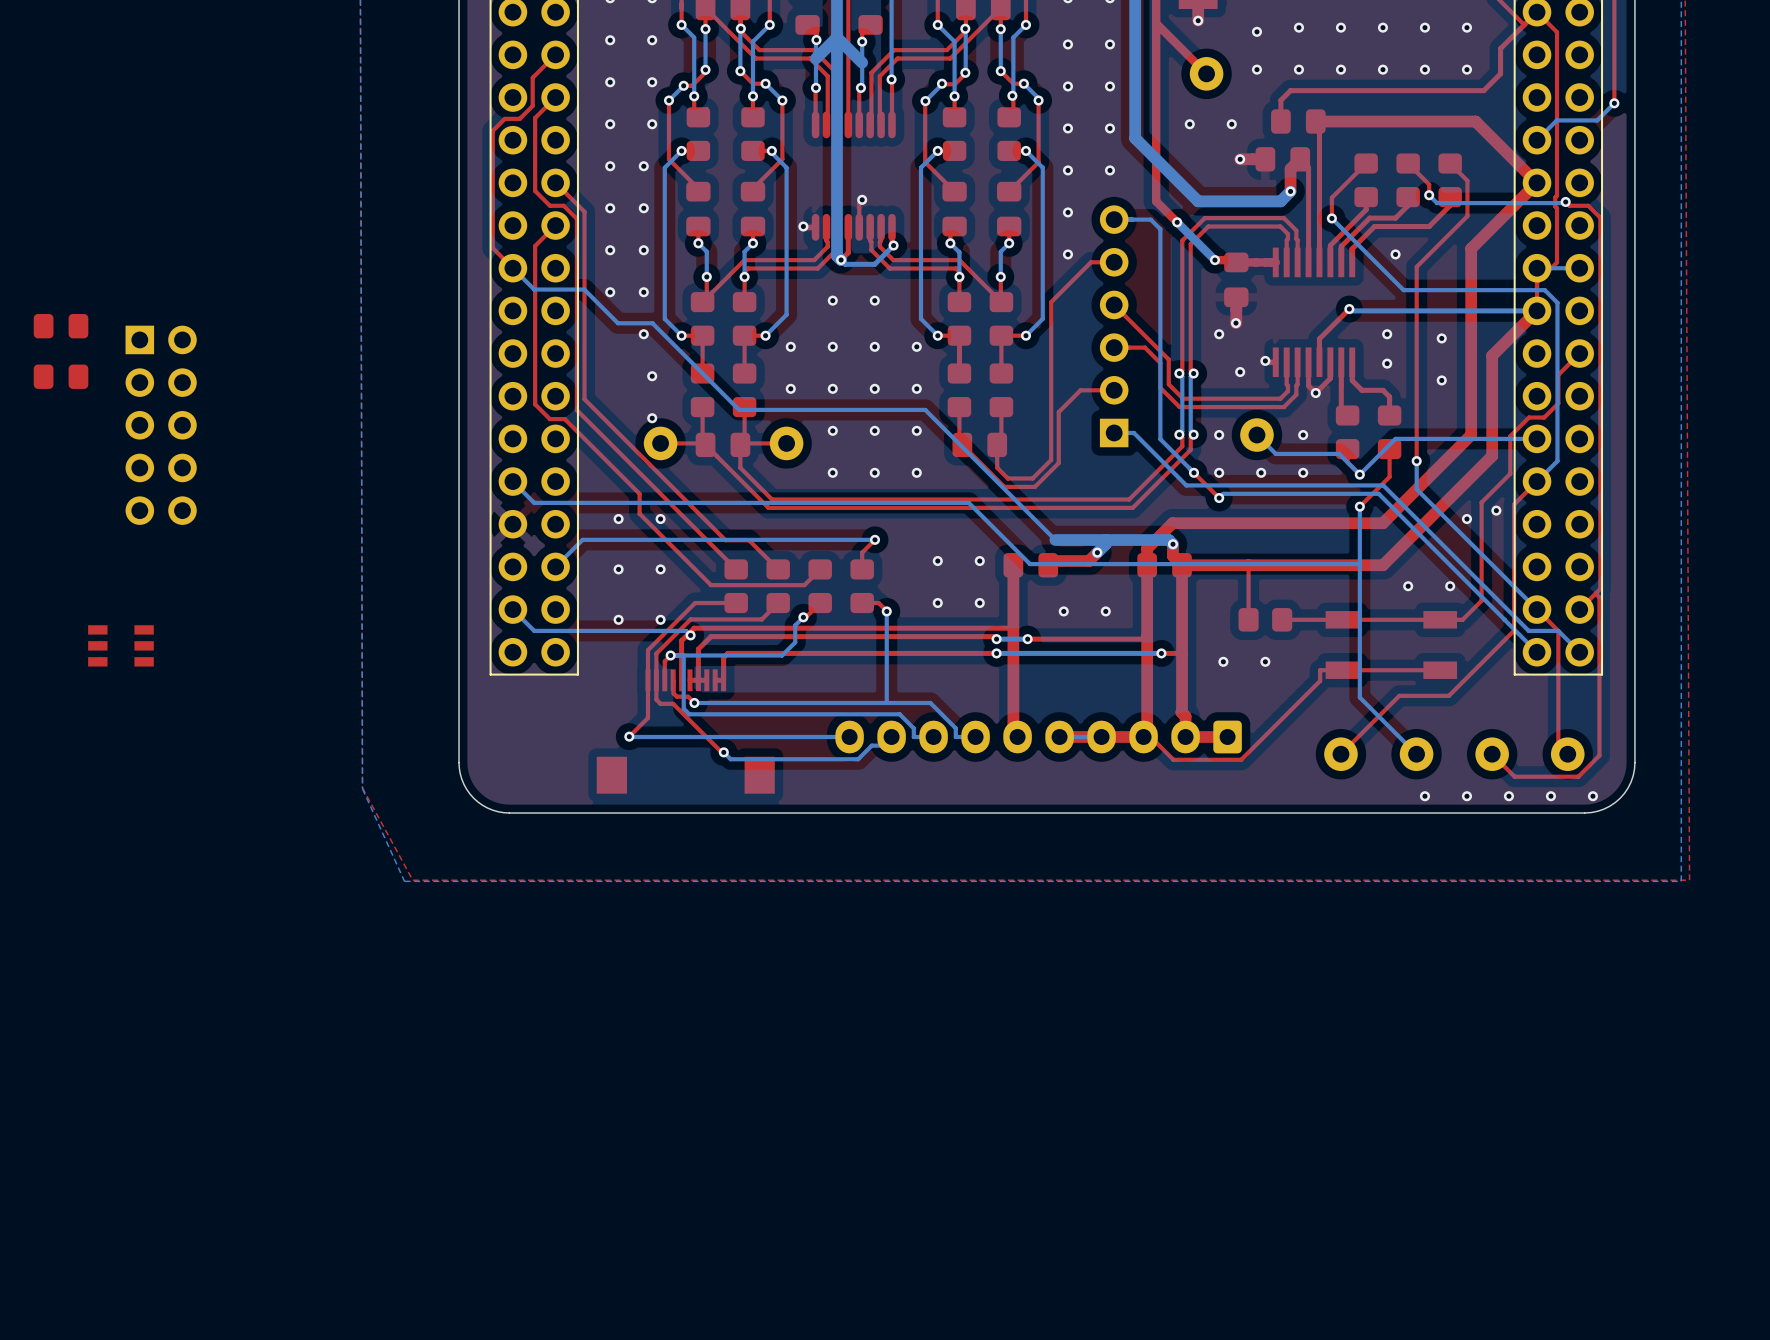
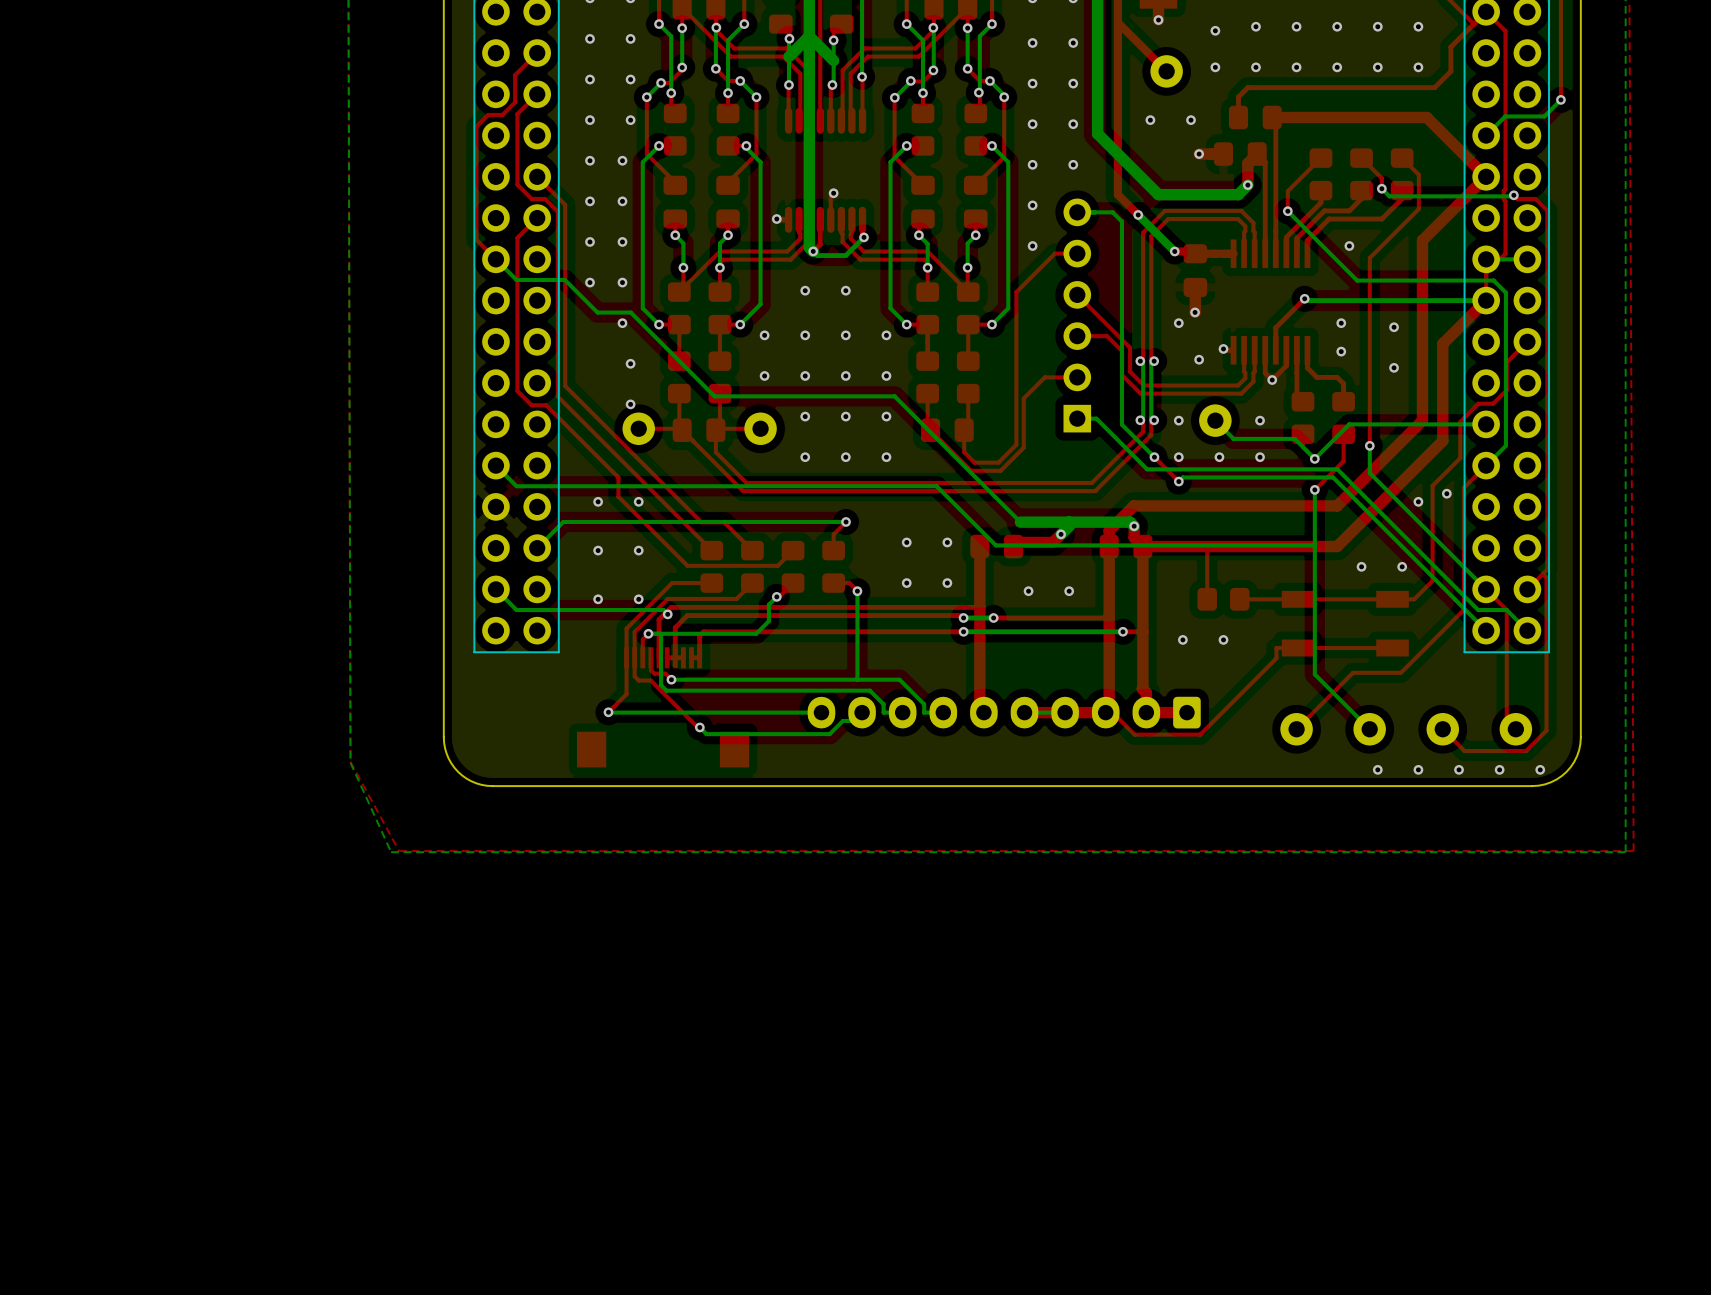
part: (61, 326) -> none
part: (61, 376) -> none
part: (161, 425) -> none
part: (120, 645) -> none

